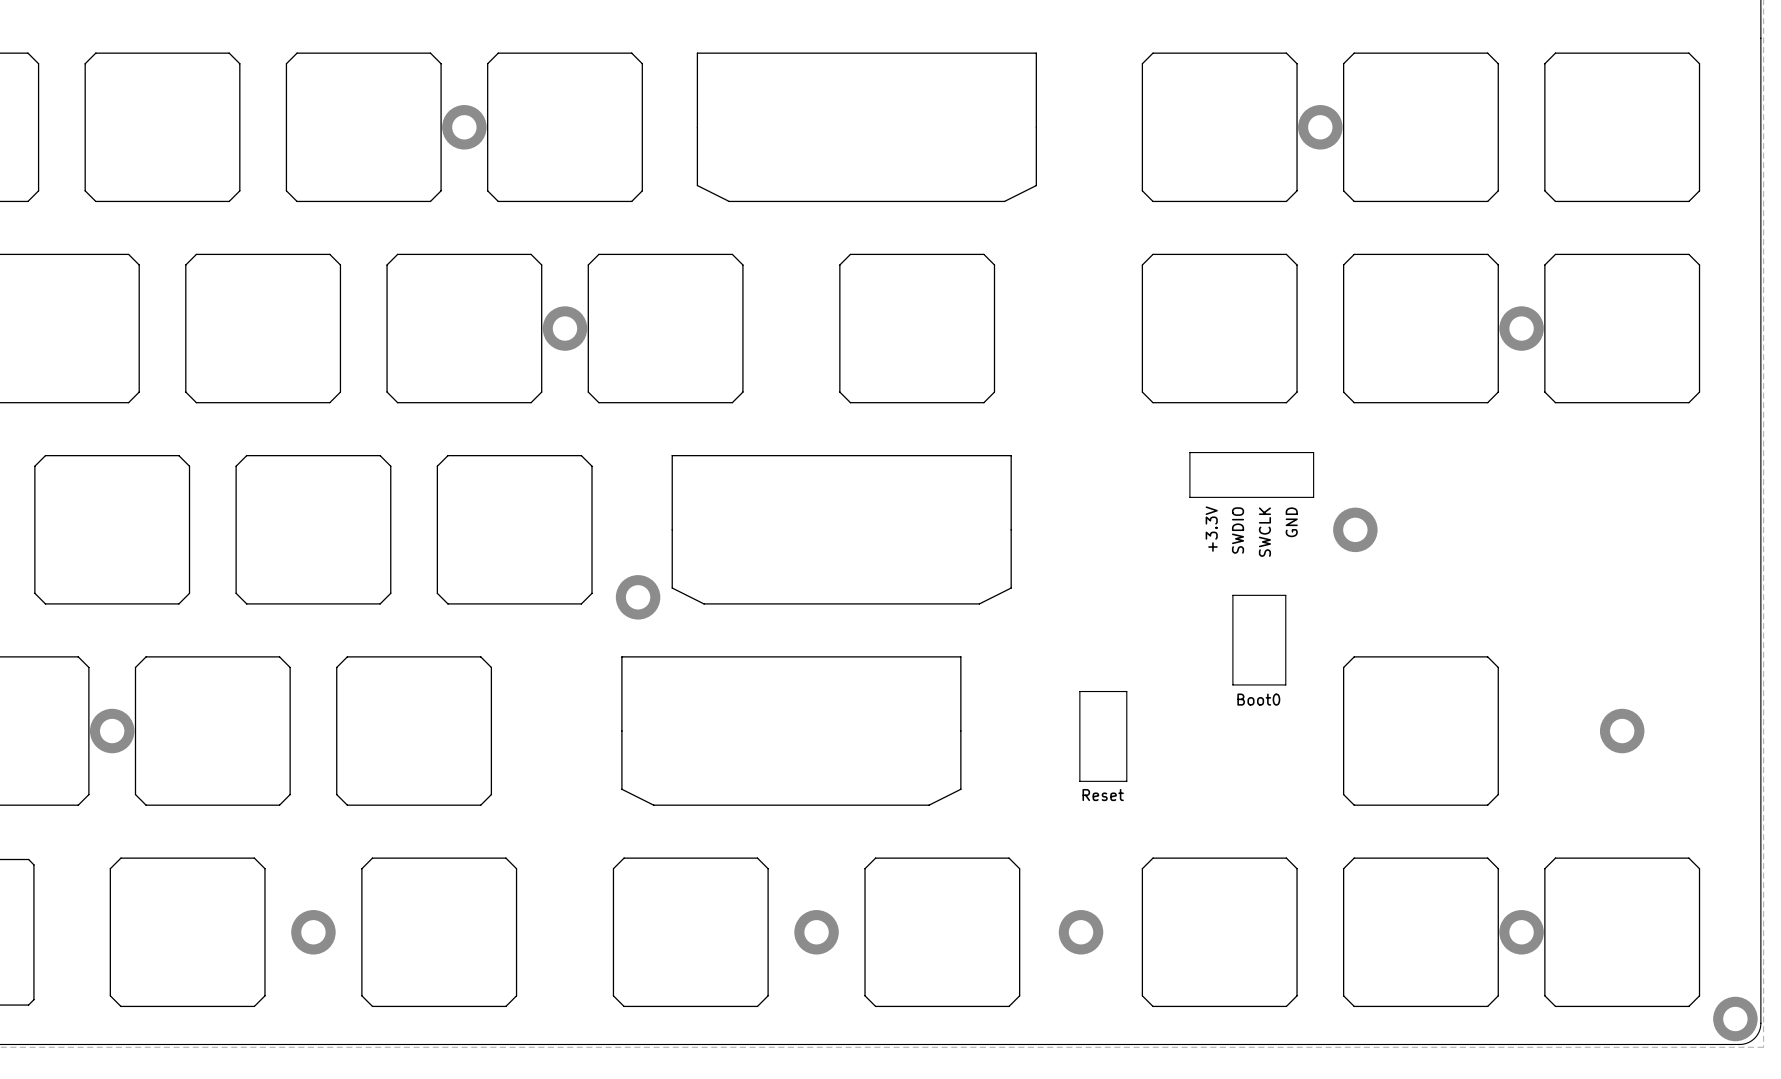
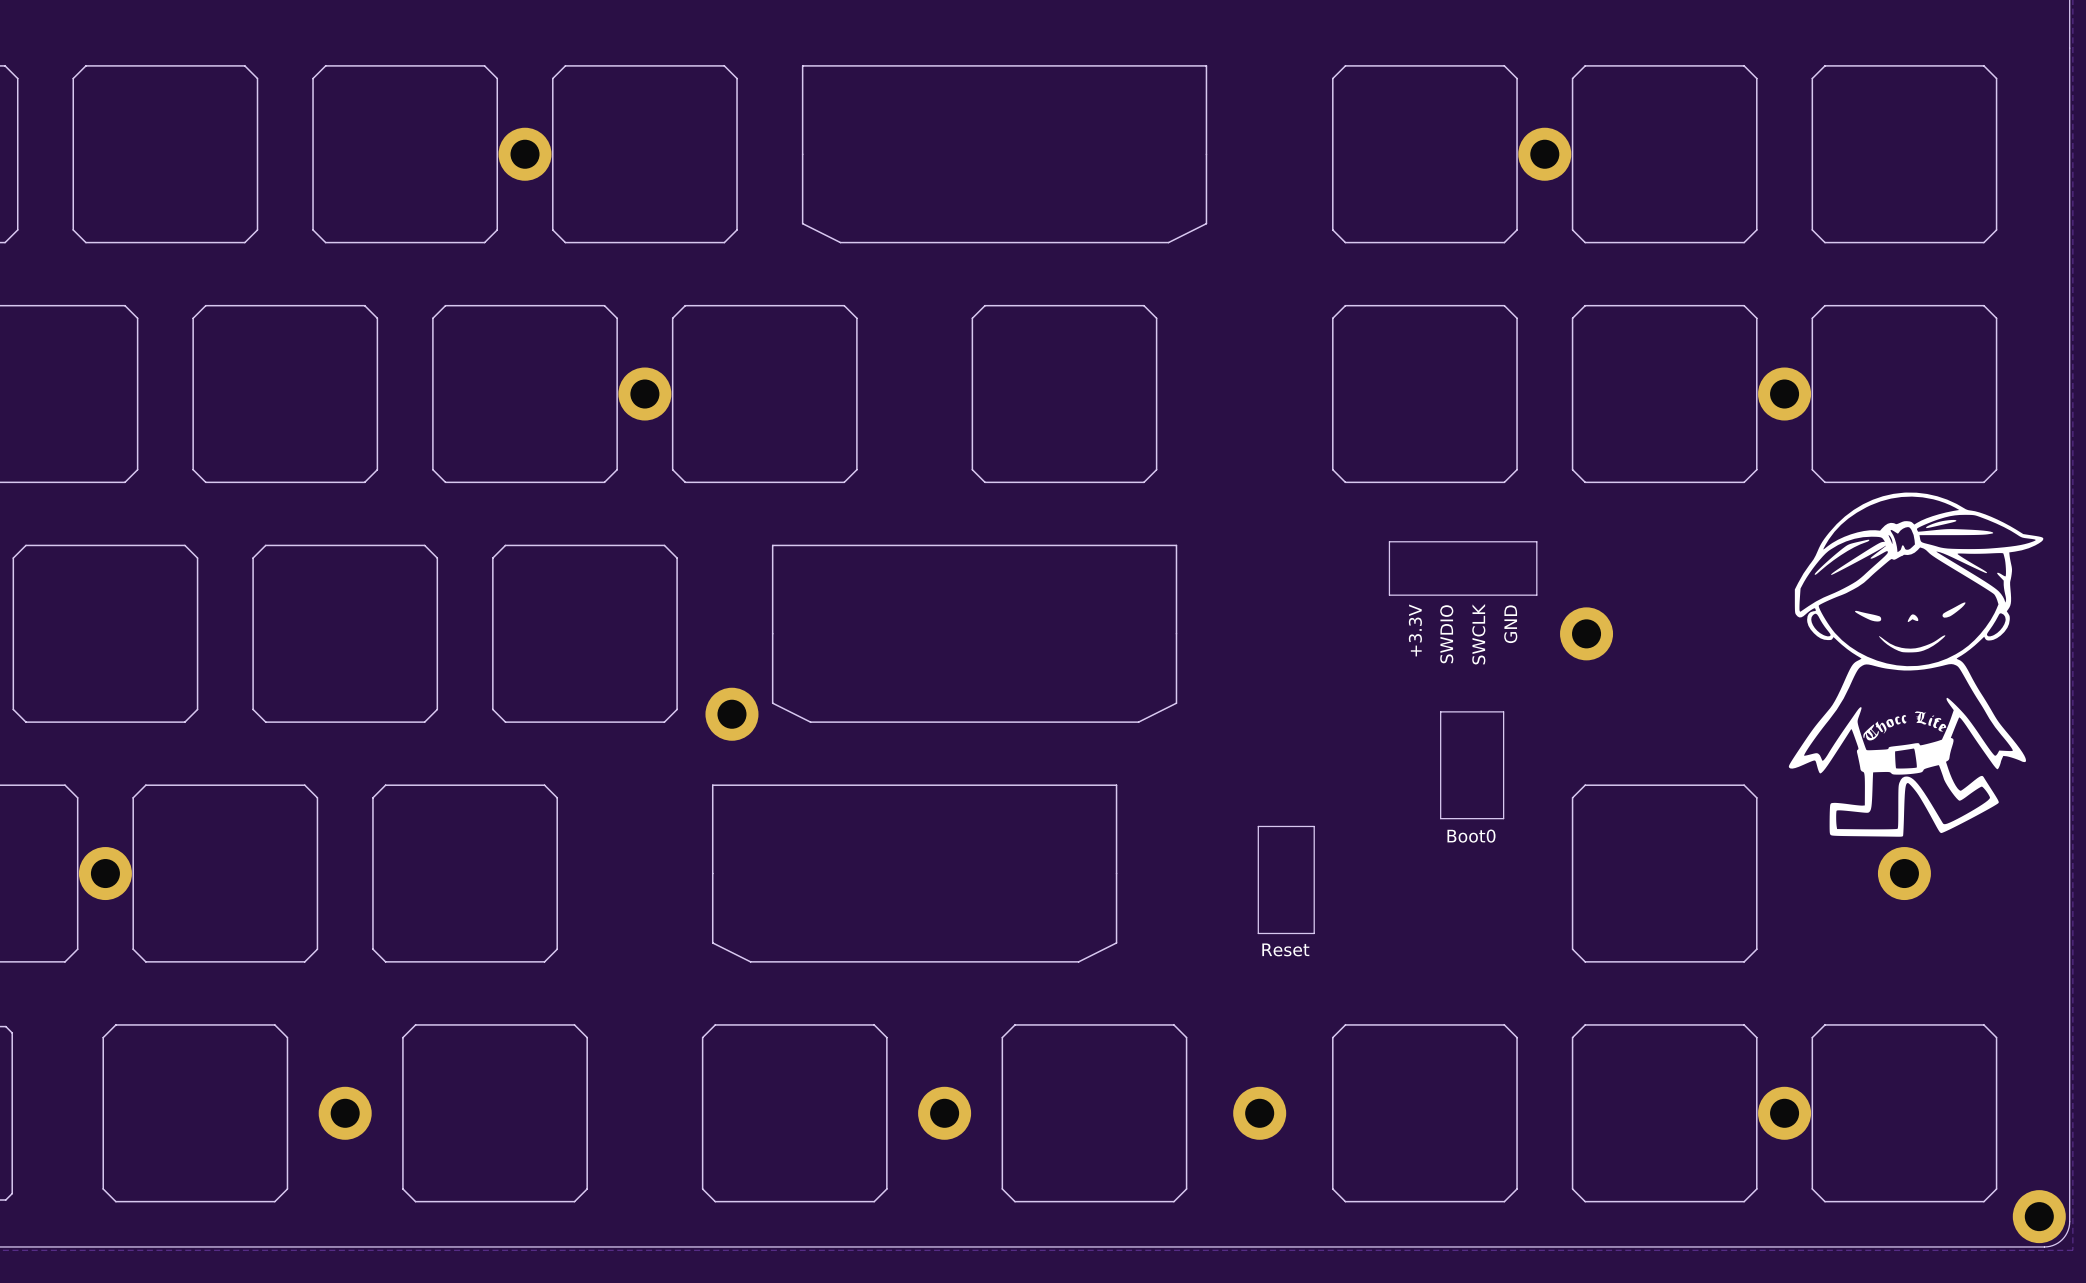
drawing: none -> [1788, 492, 2044, 837]

